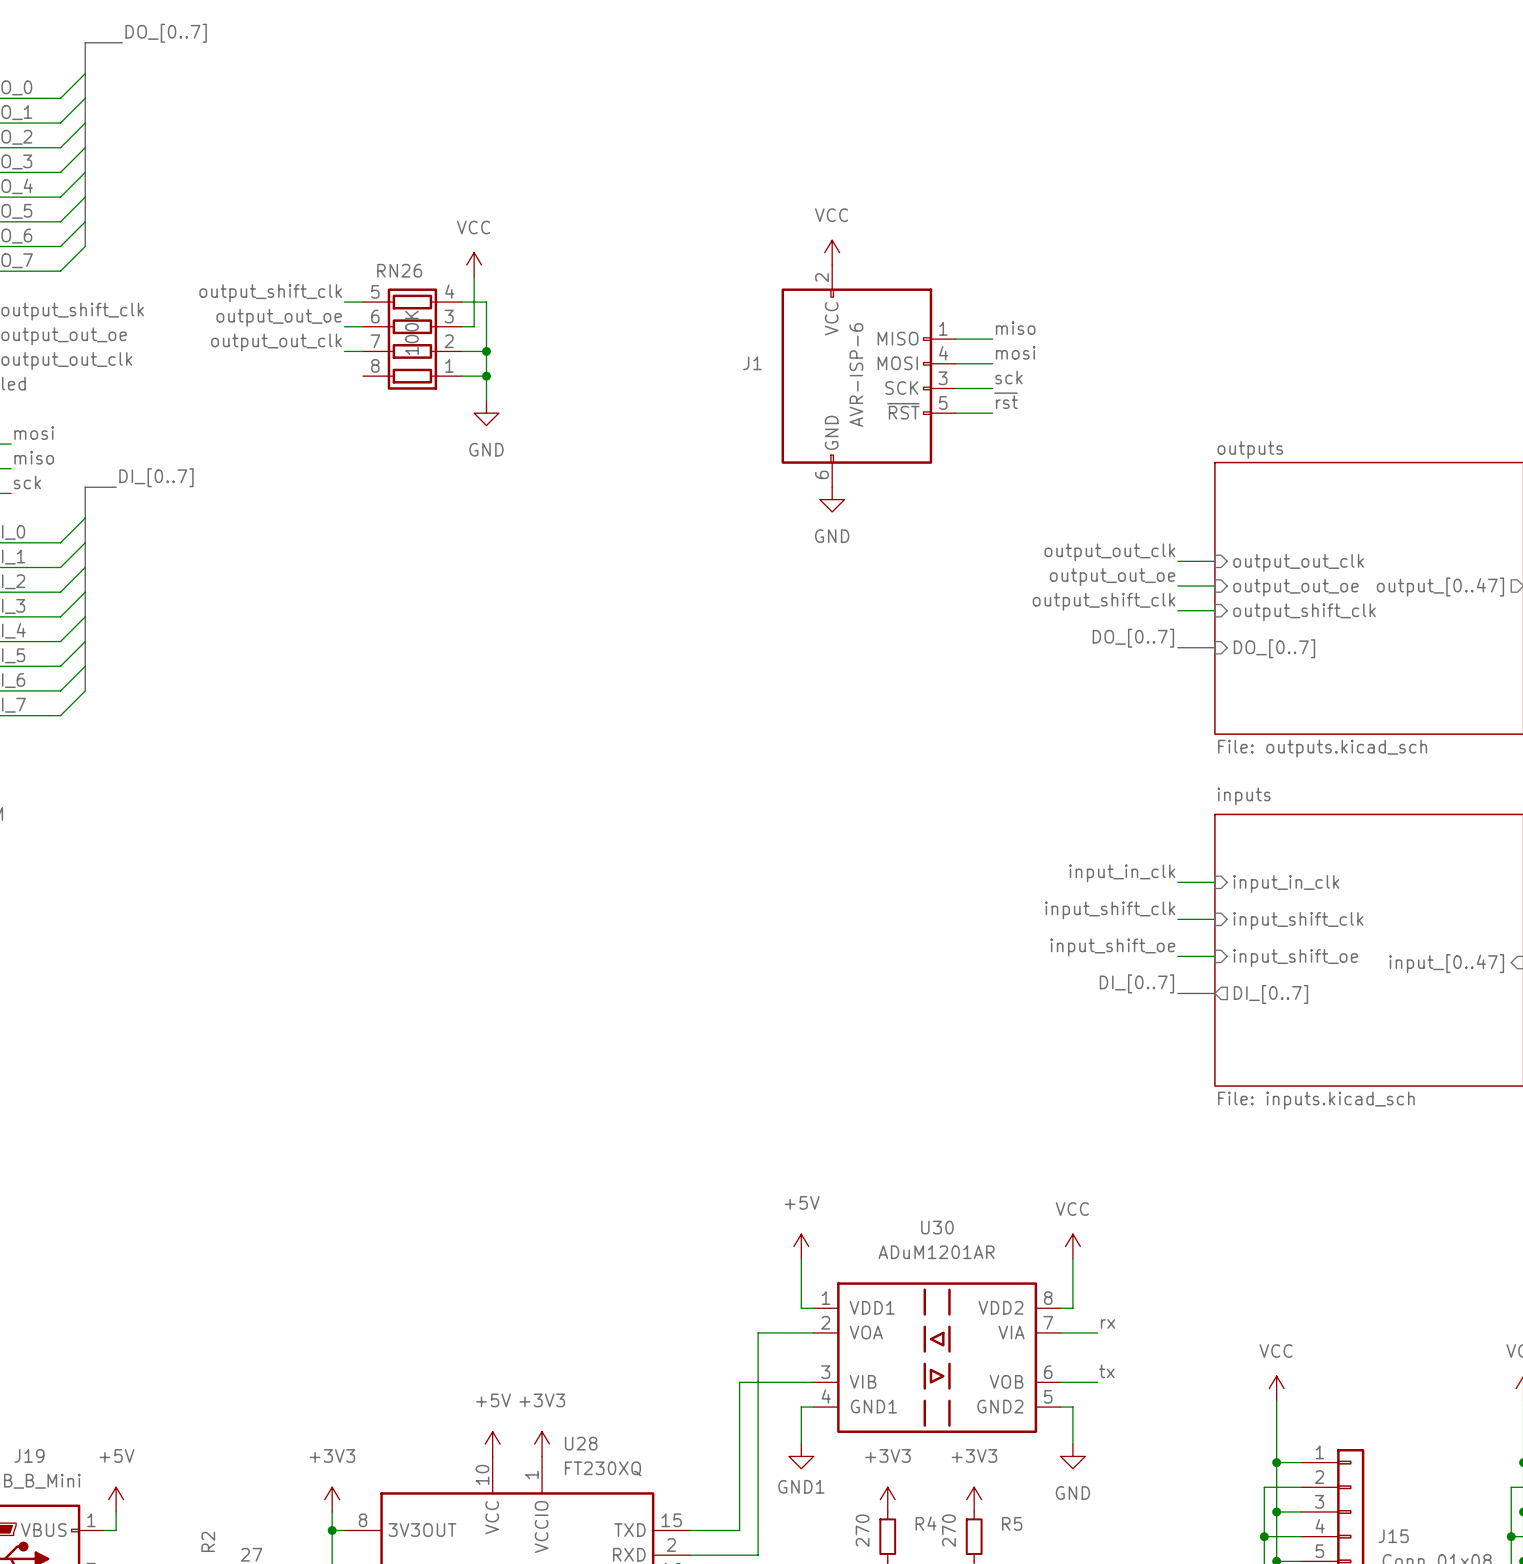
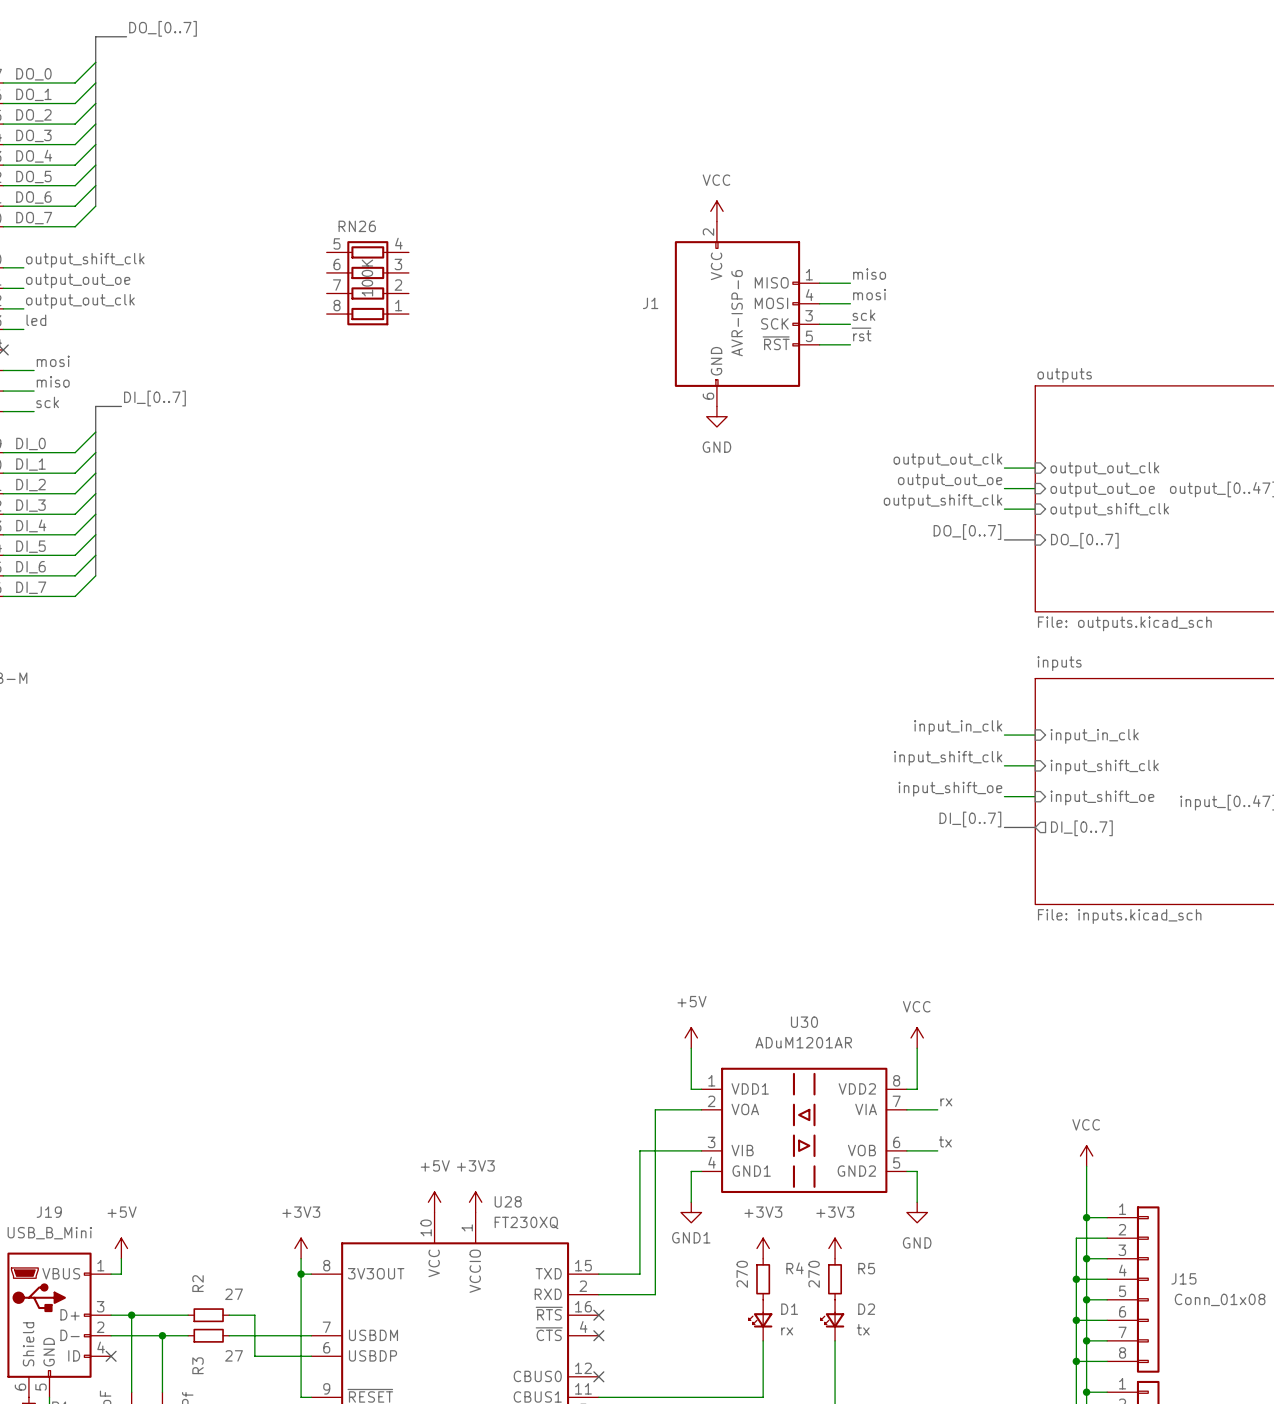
power symbol: VCC (474, 265) -> none
wire: (474, 277) (474, 326) (461, 326) -> none
label: output_shift_clk (270, 293) -> none
wire: (344, 302) (363, 302) -> none
wire: (461, 302) (486, 302) (486, 400) -> none
label: output_out_oe (279, 317) -> none
wire: (344, 326) (363, 326) -> none
label: output_out_clk (276, 342) -> none
wire: (344, 351) (363, 351) -> none
wire: (461, 351) (486, 351) -> none
junction: (486, 351) -> none
wire: (461, 376) (486, 376) -> none
junction: (486, 376) -> none
power symbol: GND (486, 413) -> none

